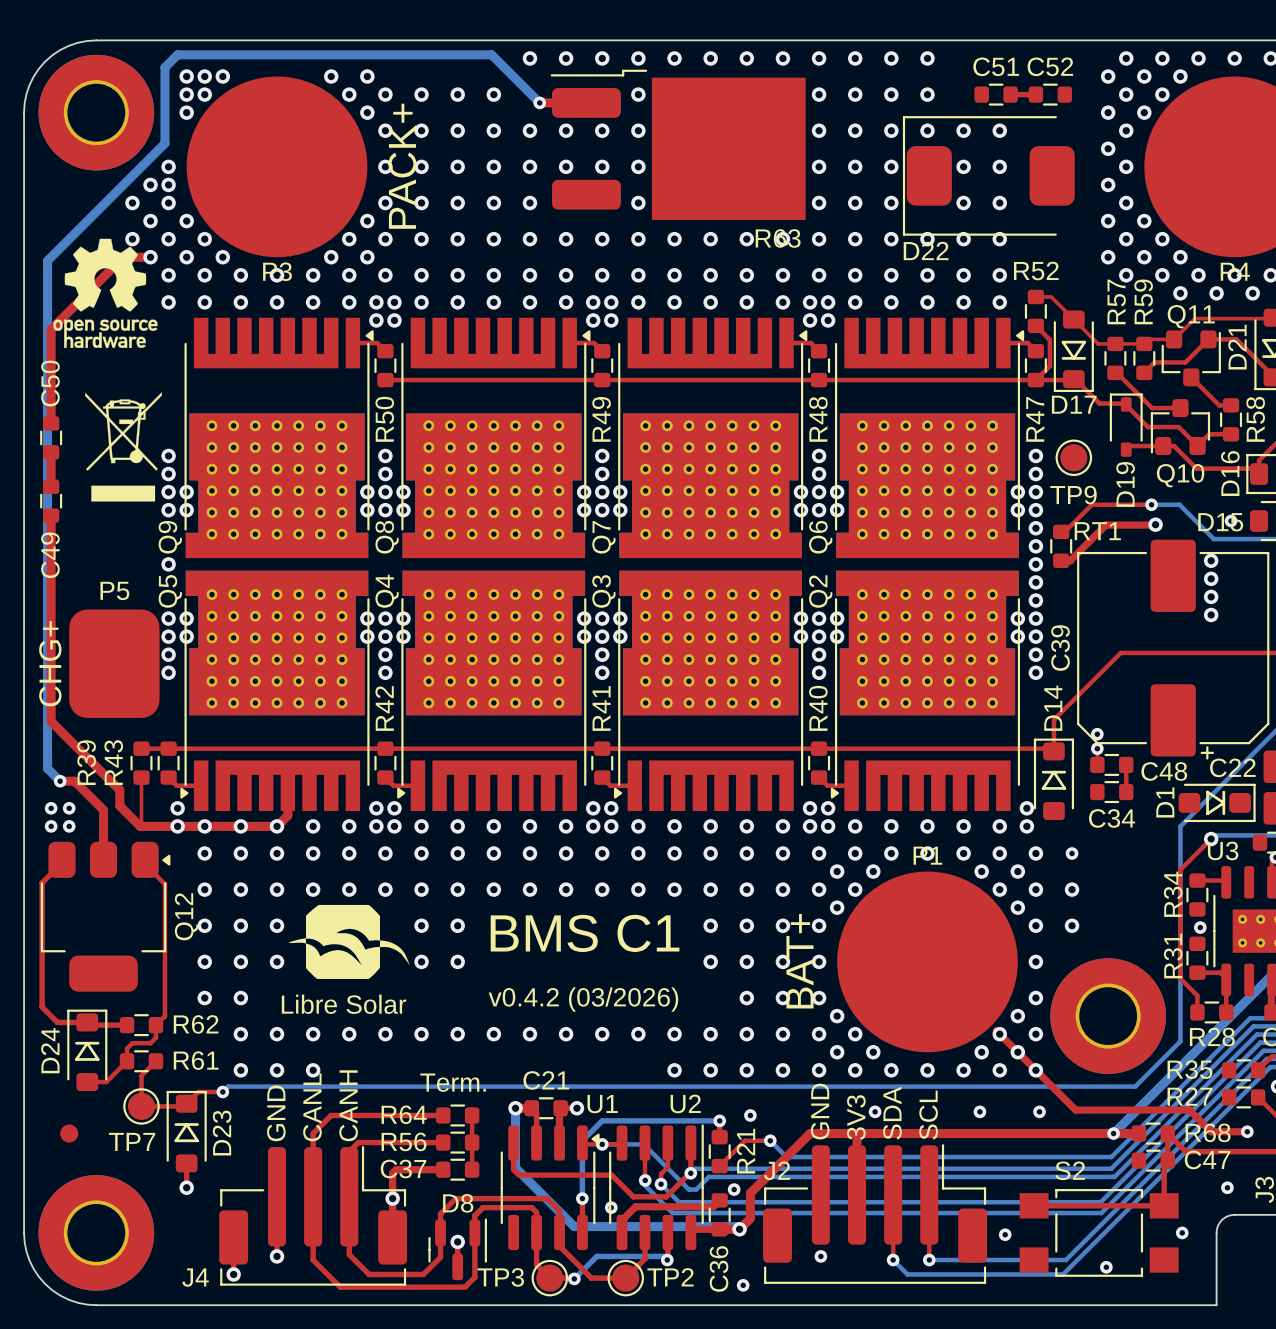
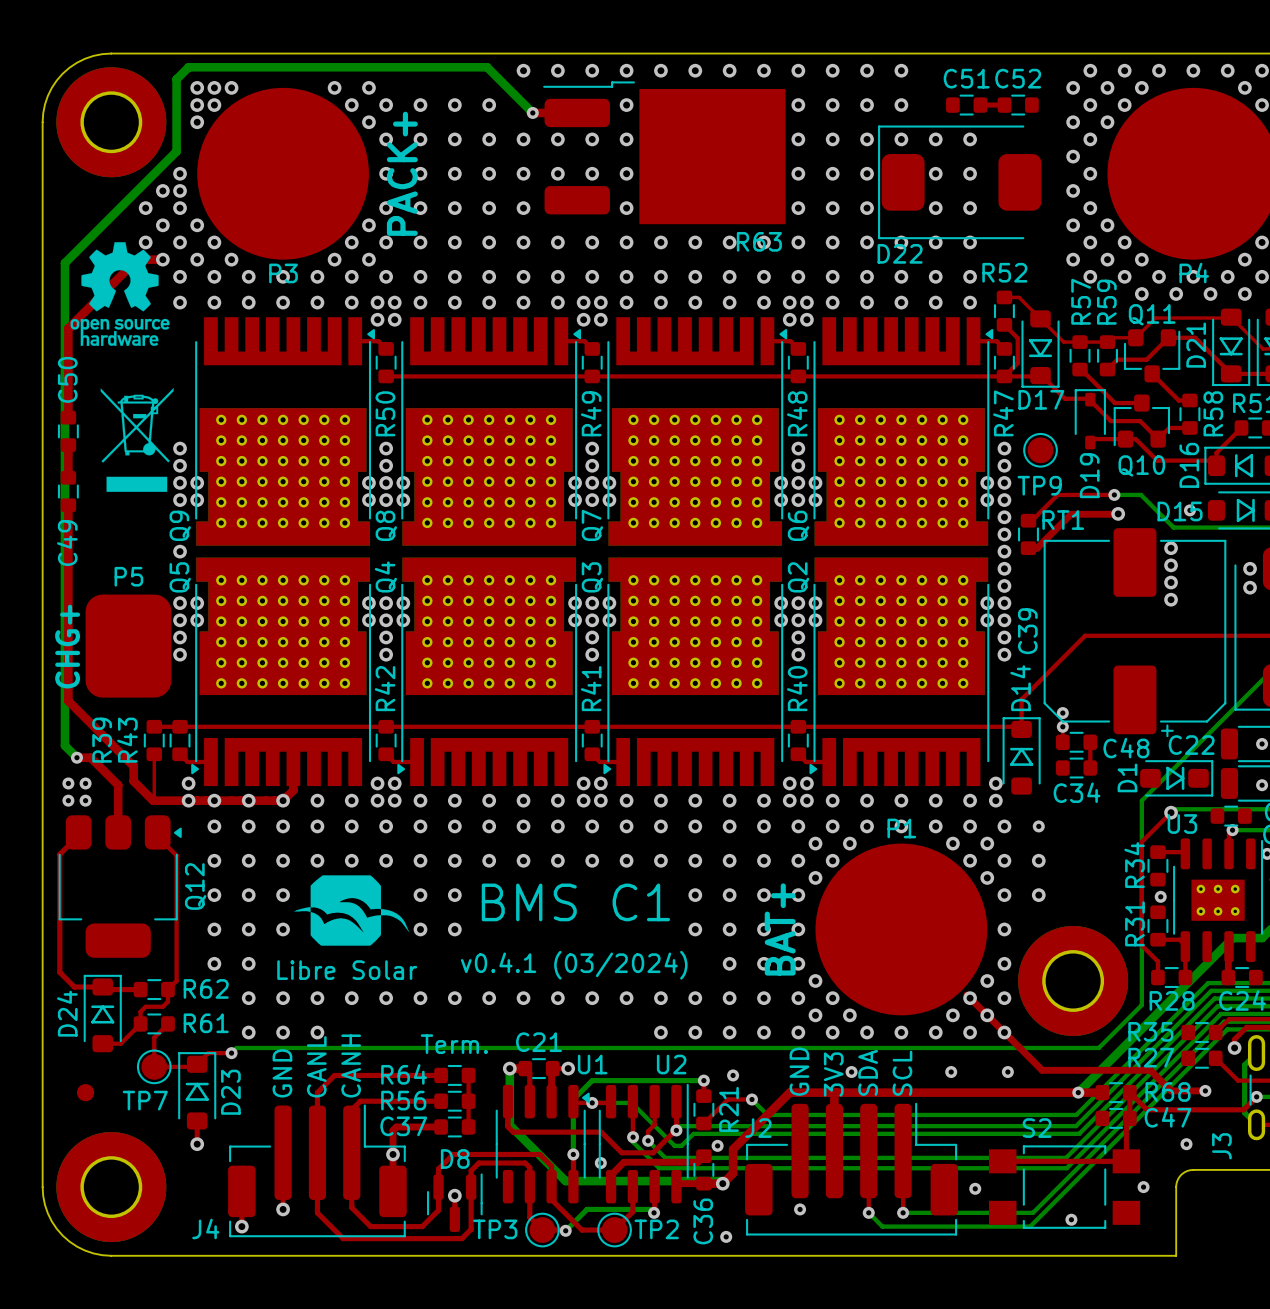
text: v0.4.2 (03/2026) (583, 999) -> v0.4.1 (03/2024) (574, 965)

